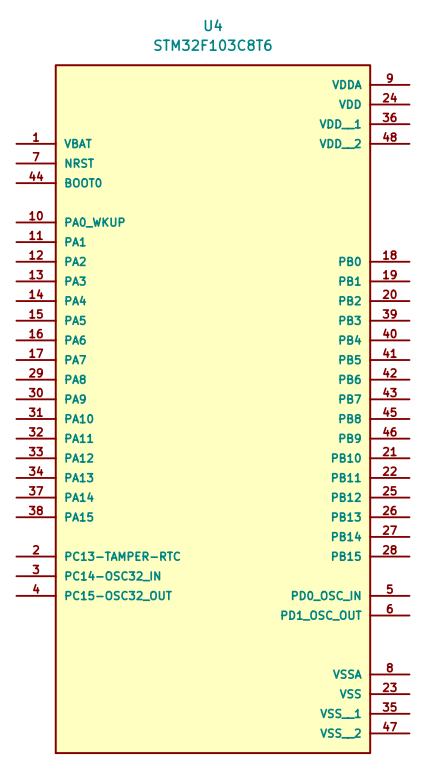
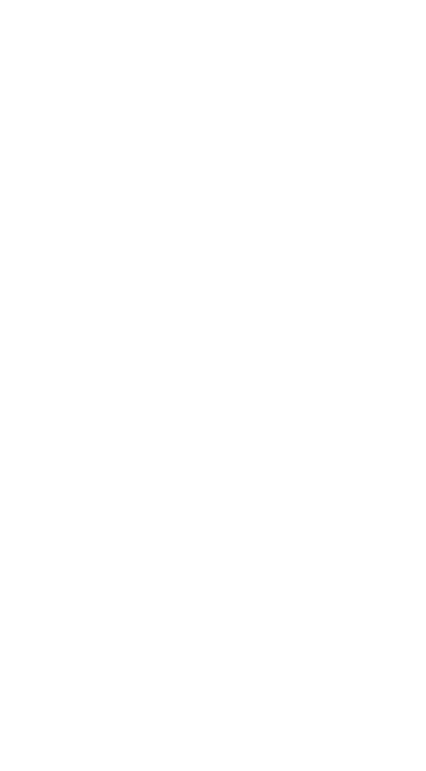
U4: STM32F103C8T6 (212, 409) -> none

